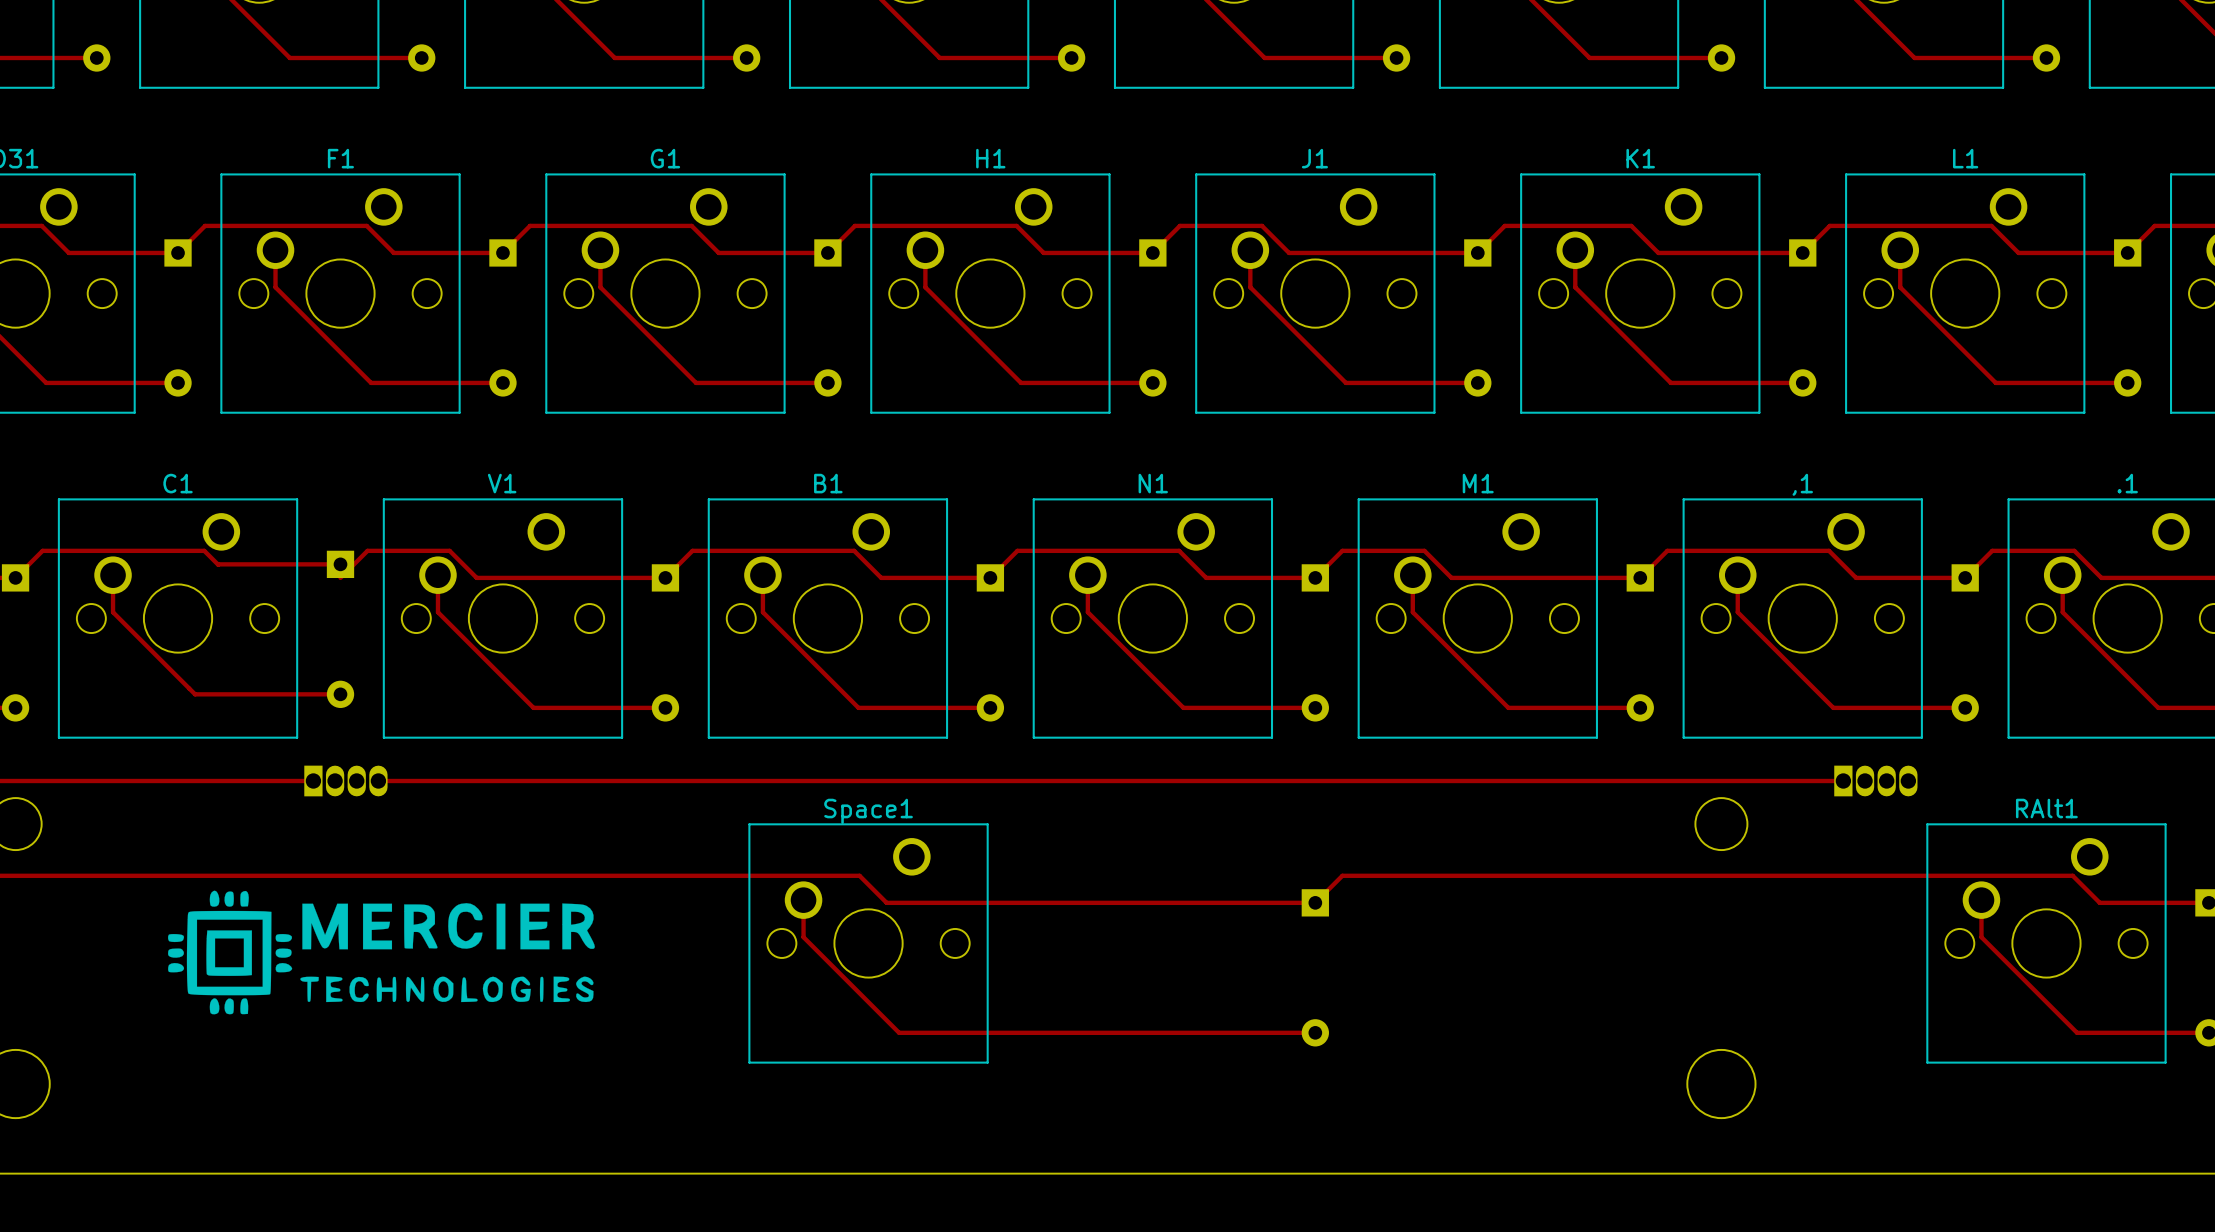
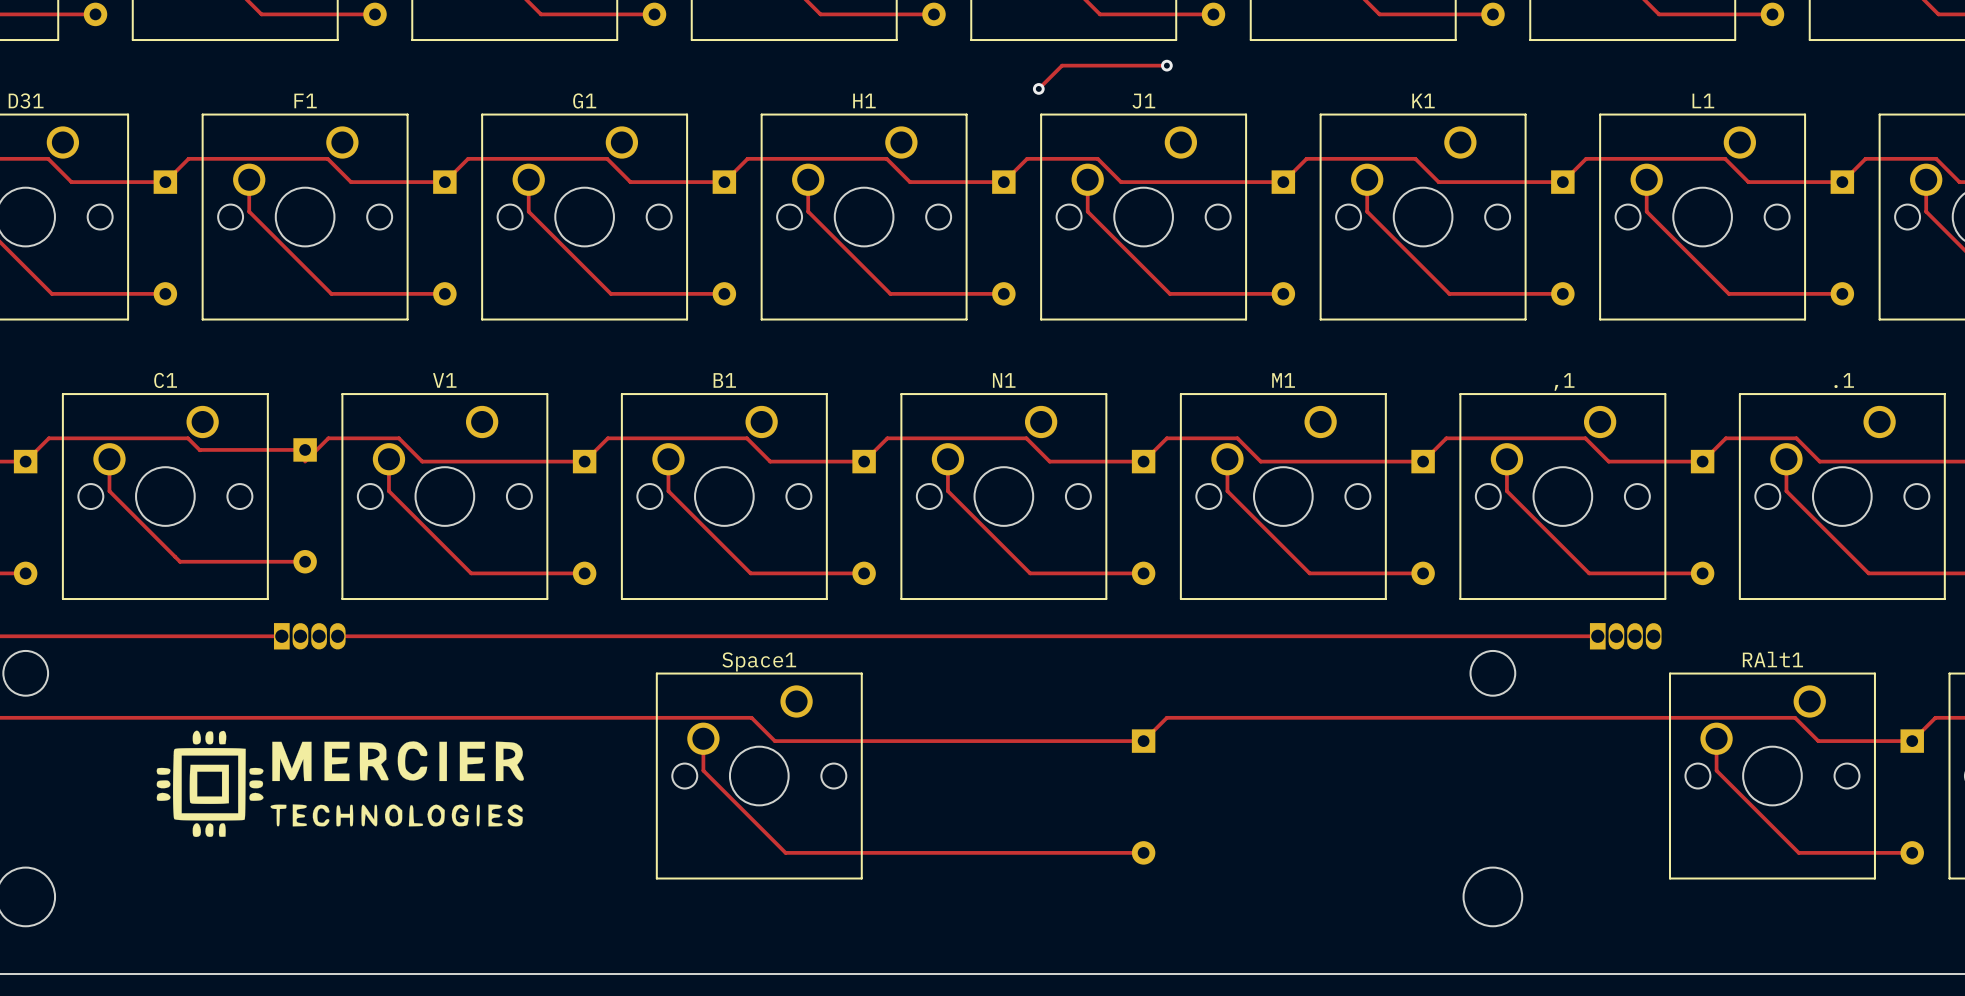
track: none -> (1166, 65) (1062, 65) (1038, 88)
via: none -> (1166, 65)
via: none -> (1038, 88)

